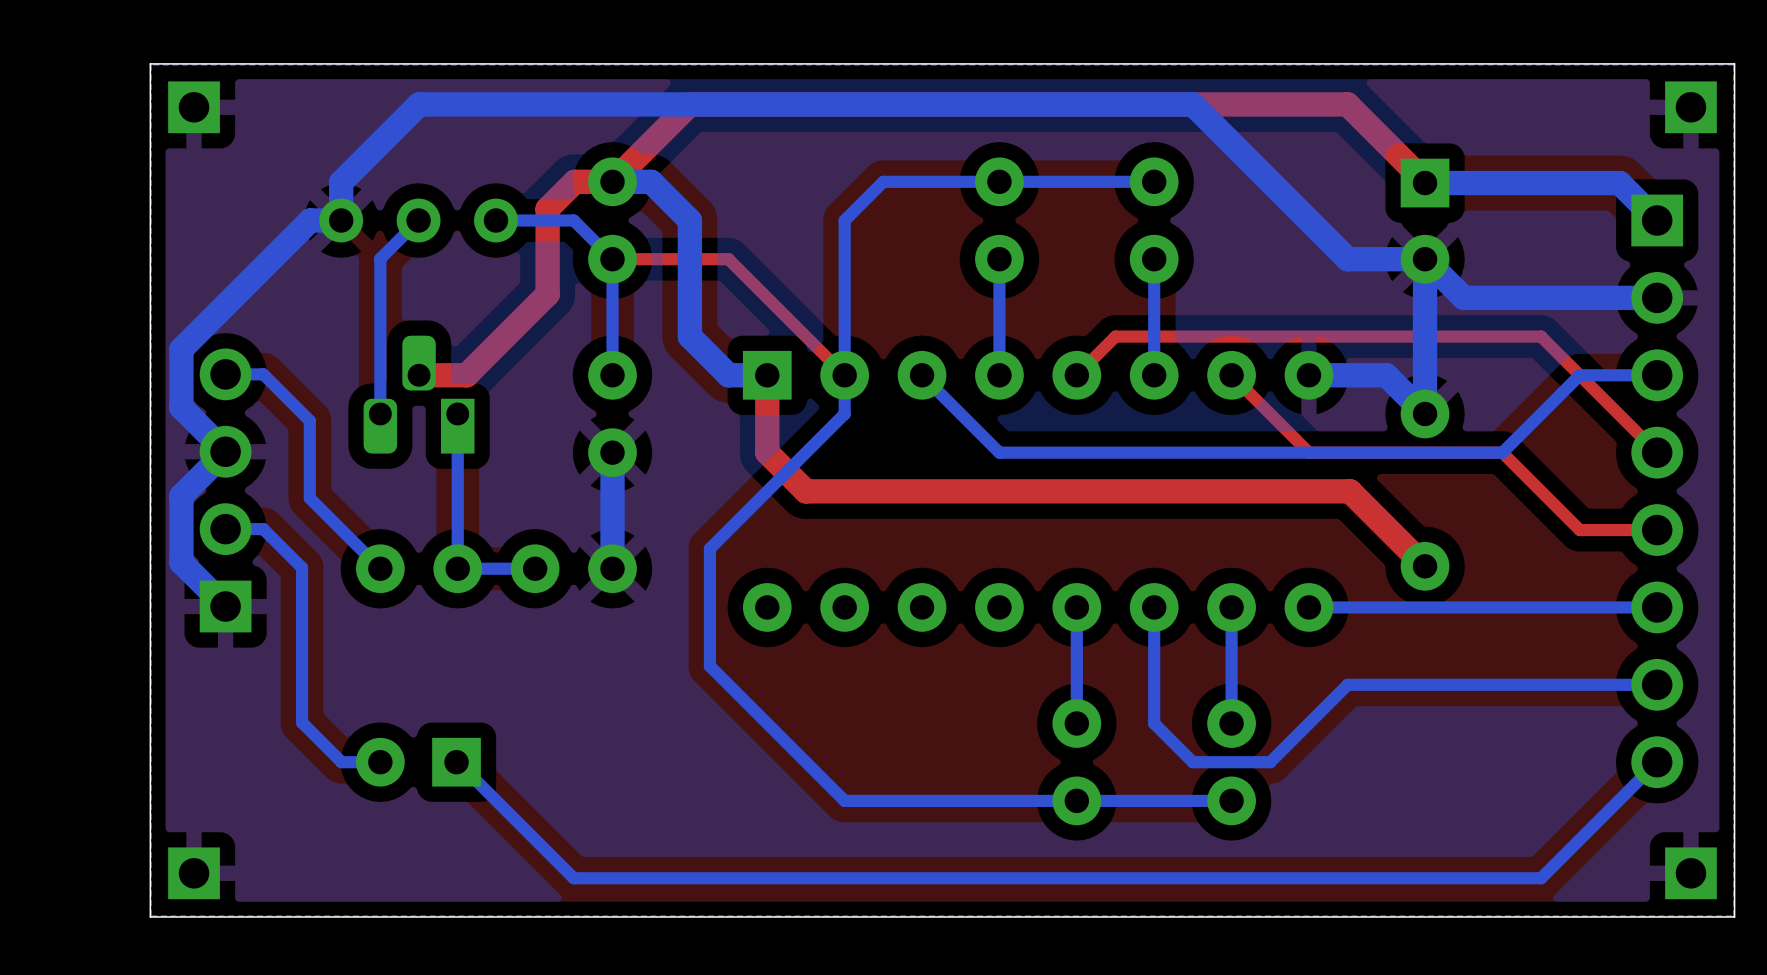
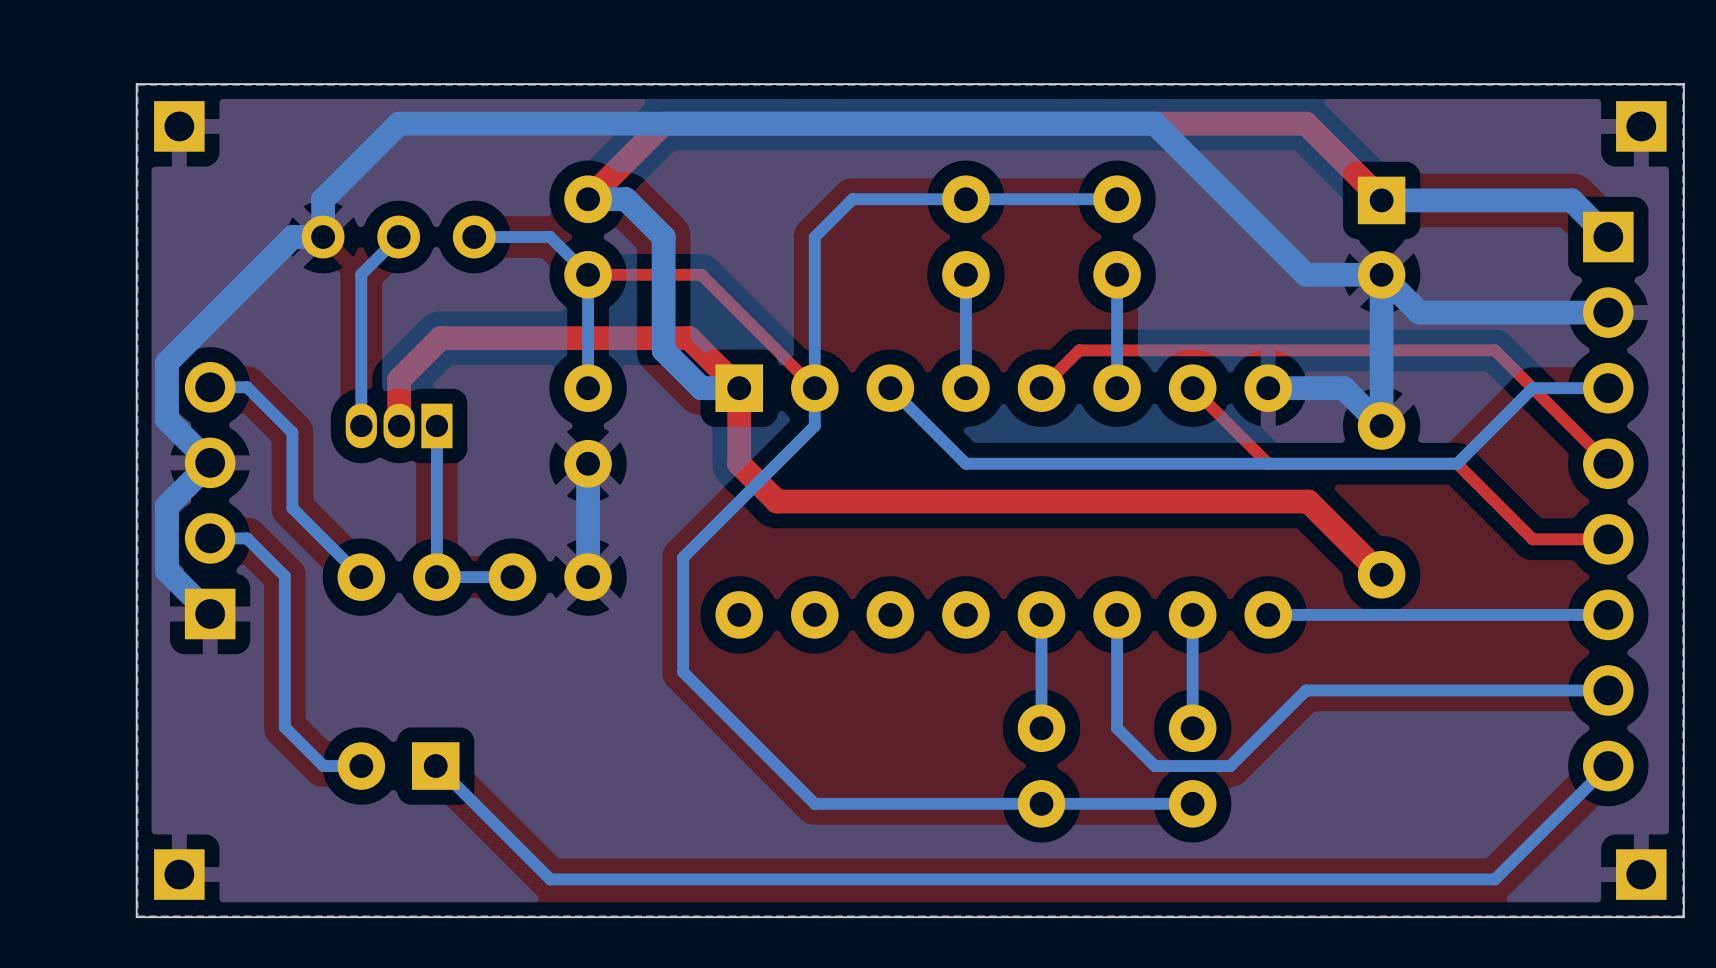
top track: (612, 181) (574, 181) (547, 208) (547, 294) (466, 375) (419, 375) -> none
part footprint: [363, 335, 475, 454] -> [345, 403, 453, 449]
top track: none -> (739, 388) (689, 338) (440, 338) (399, 379) (399, 425)

